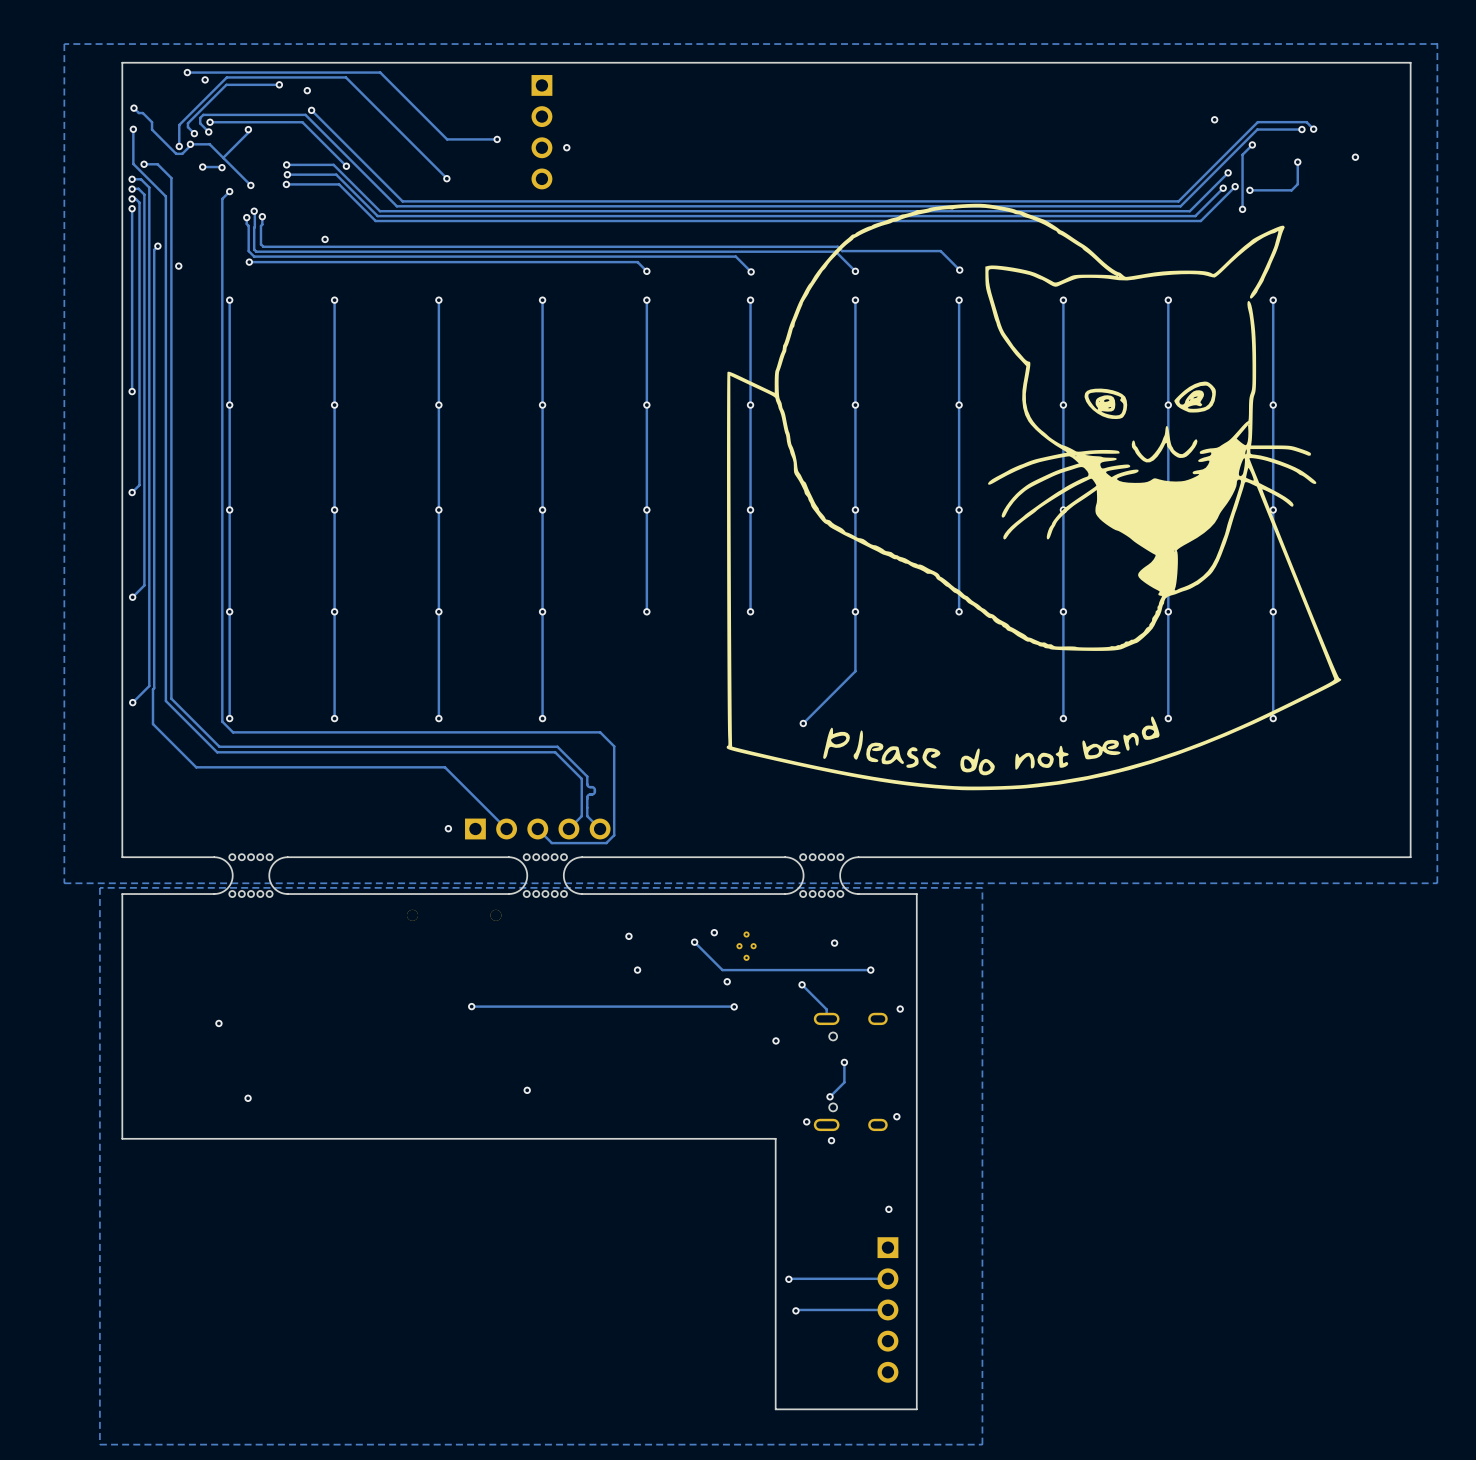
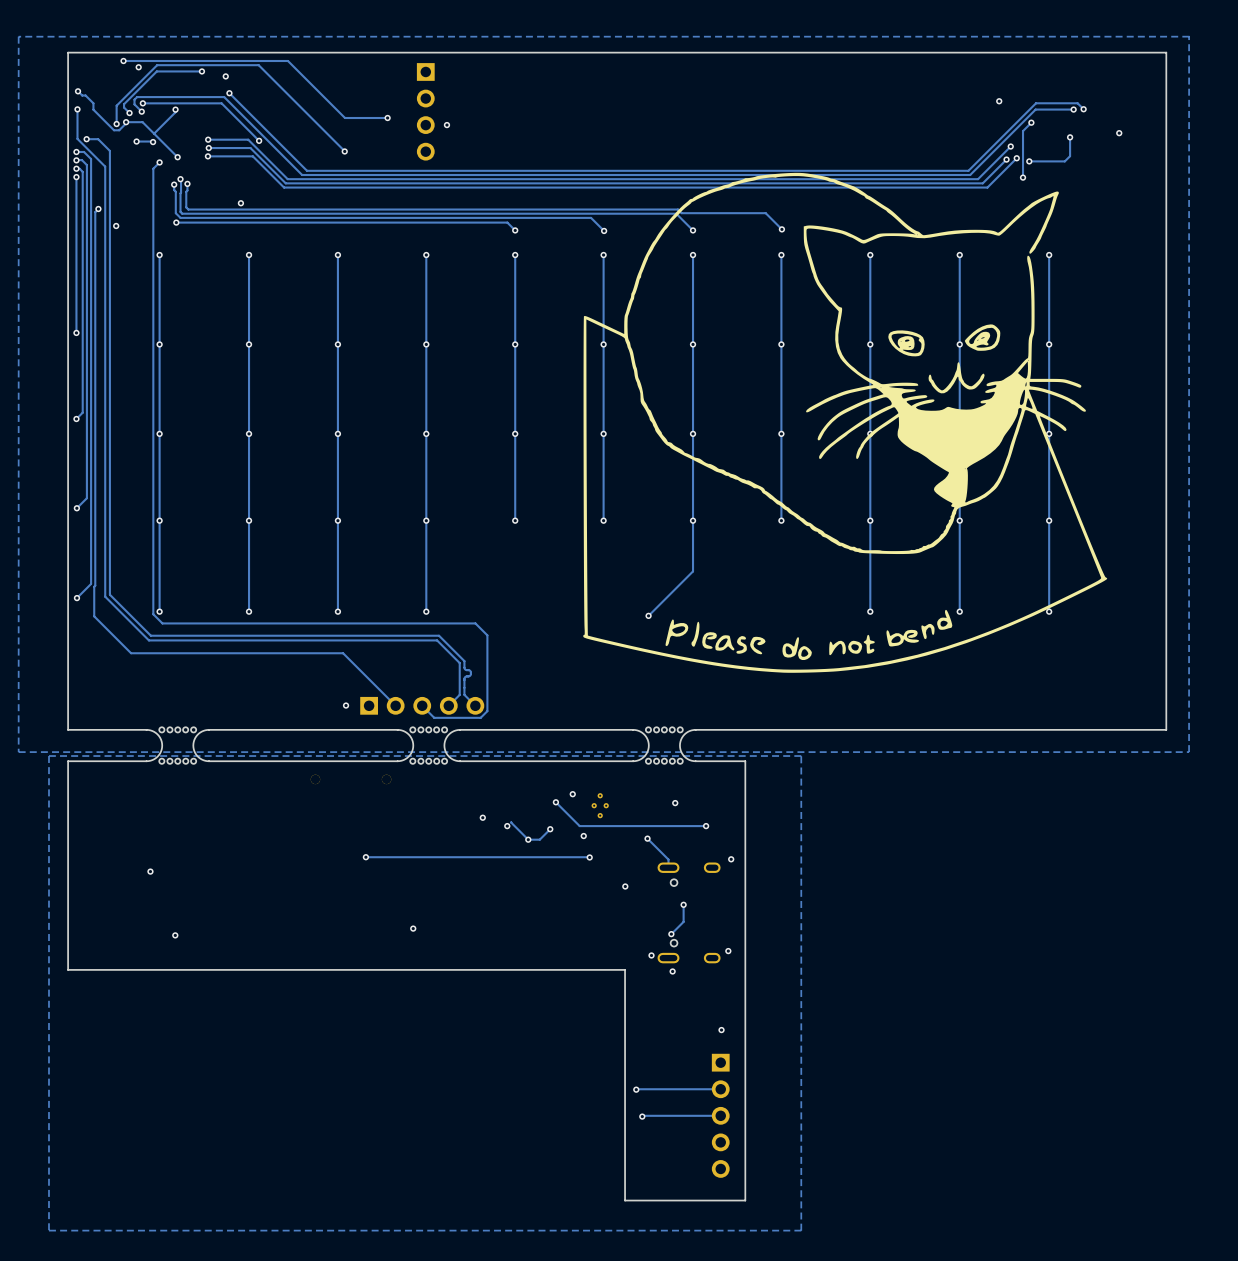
via: (628, 936) -> none
via: none -> (482, 817)
track: none -> (511, 822) (528, 839) (539, 839) (550, 829)
via: none -> (550, 829)
via: none -> (528, 839)

